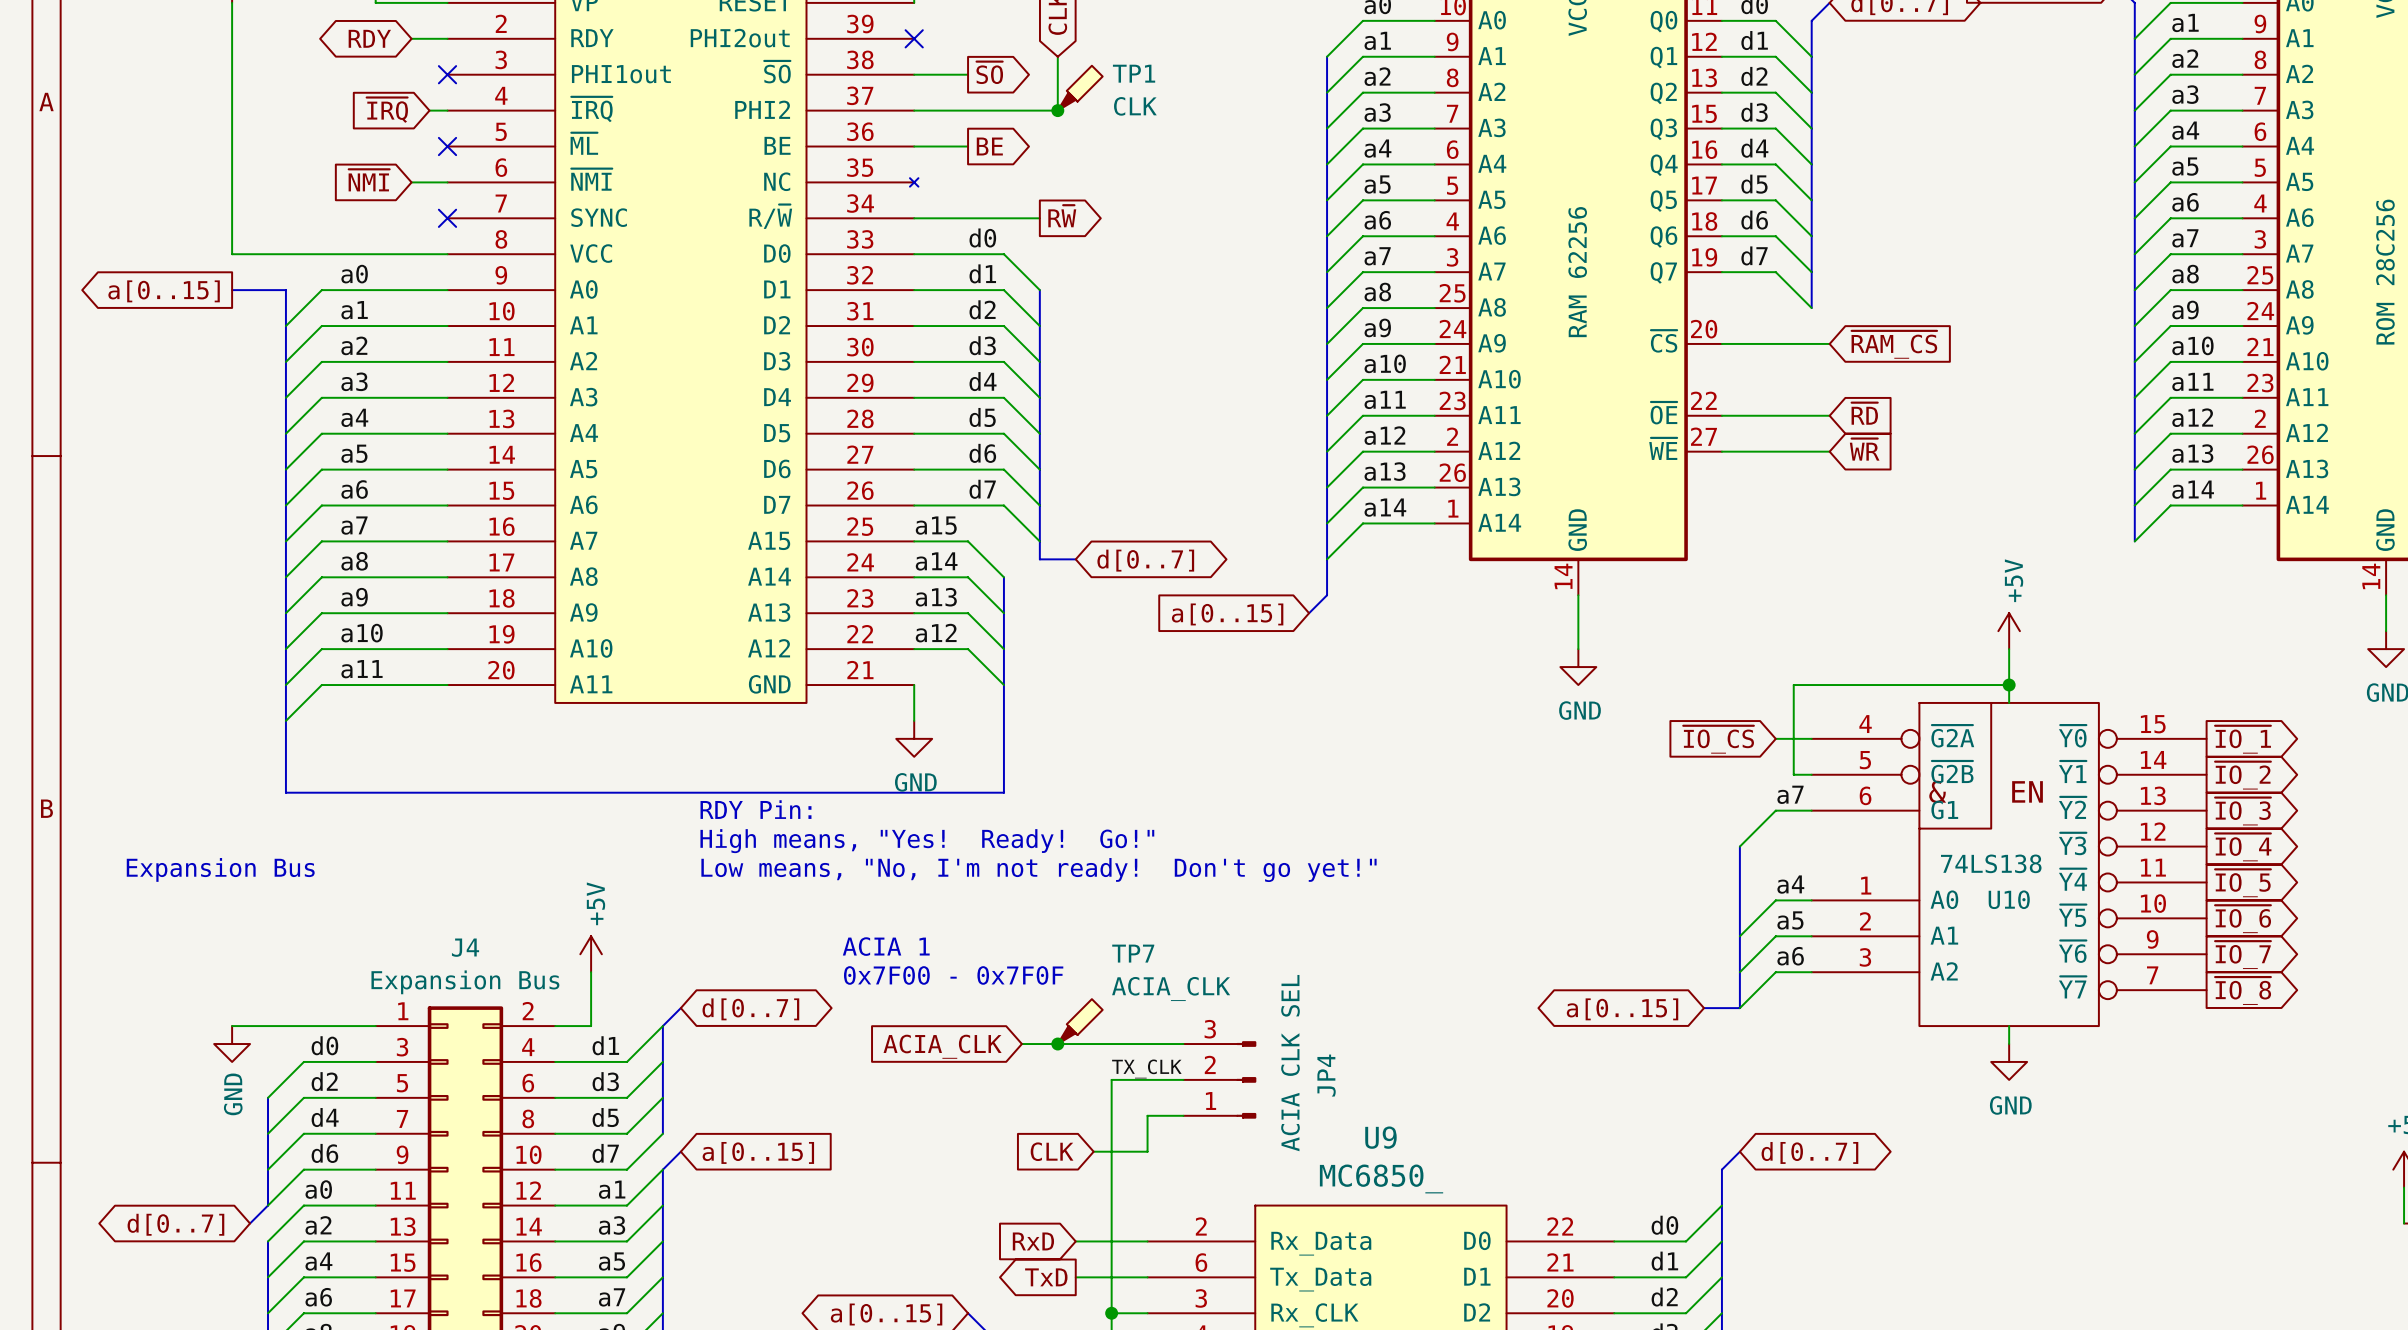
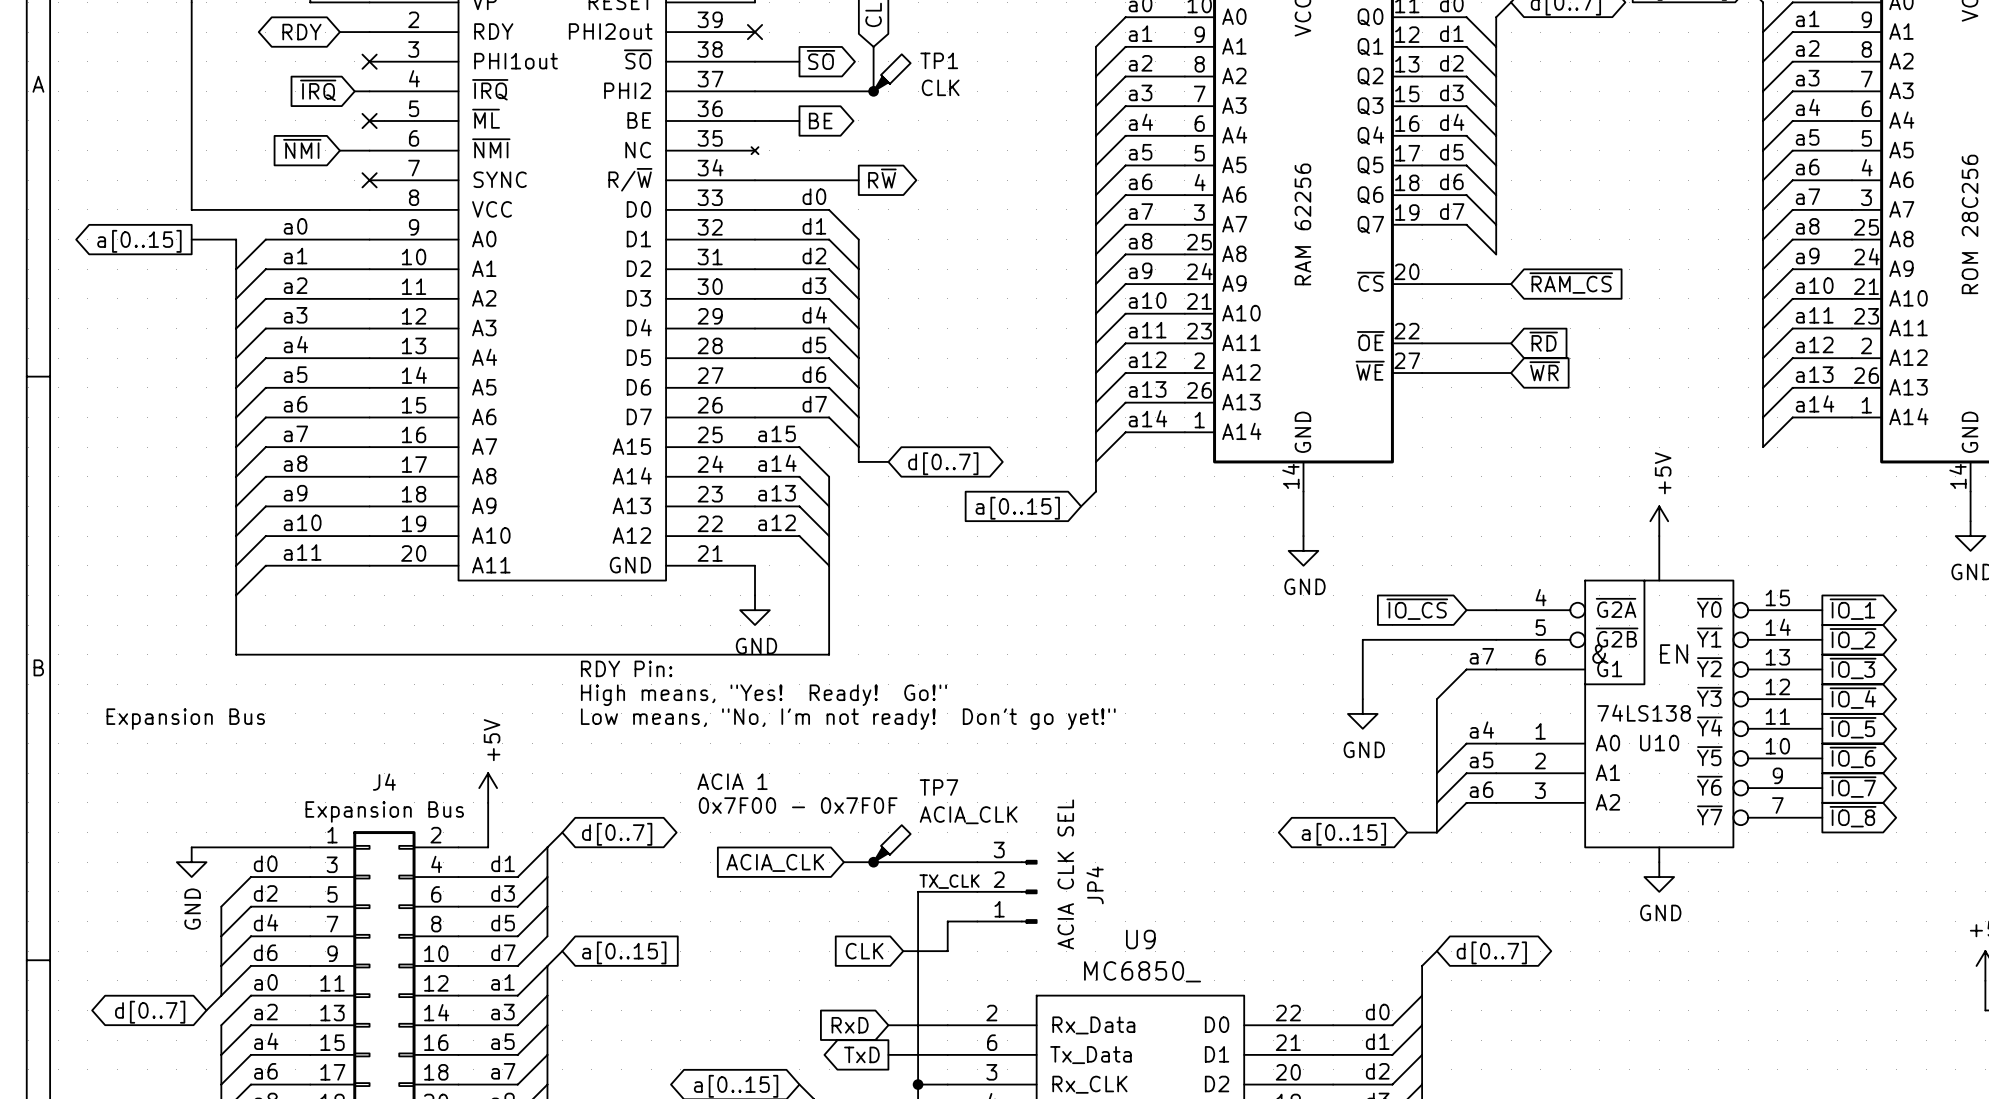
wire: (2009, 685) (1793, 685) (1793, 774) -> (1362, 699) (1362, 639) (1481, 639)
junction: (2009, 685) -> none
power symbol: none -> GND (1362, 713)

